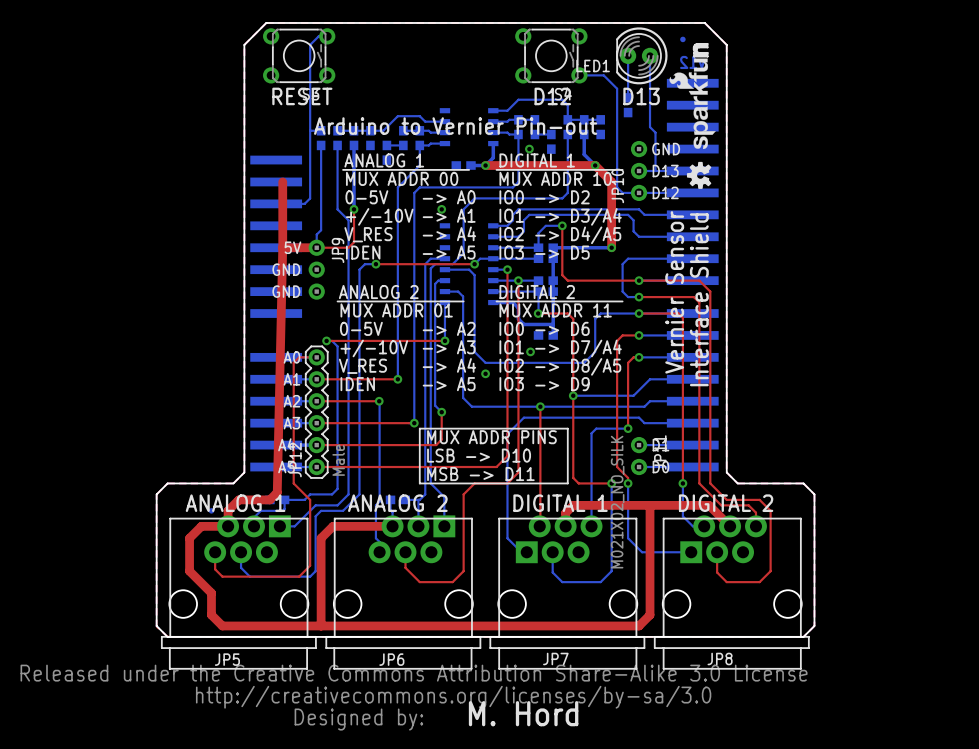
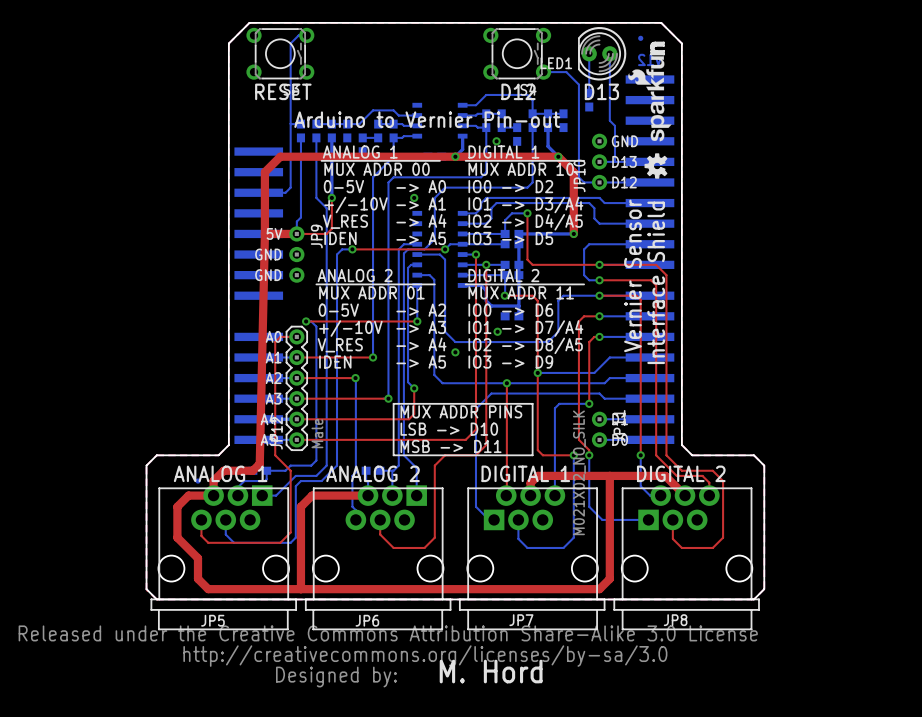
top track: none -> (455, 156) (280, 156) (264, 172)

